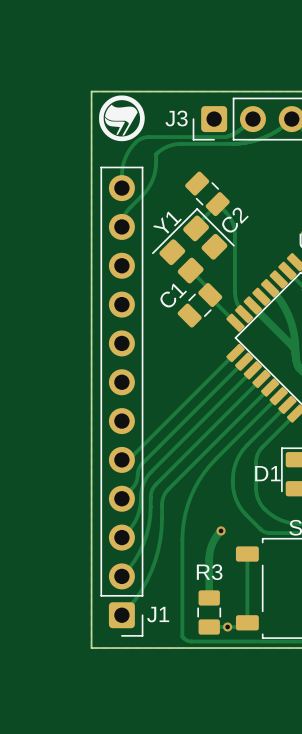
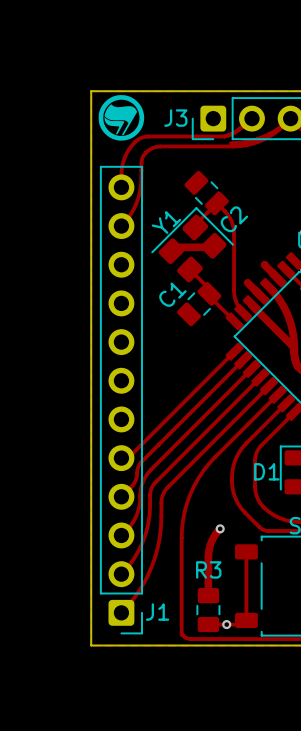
track: none -> (290, 118) (272, 134) (247, 145) (158, 146) (146, 152)
track: (233, 143) (176, 144) (160, 150) (156, 154) (155, 171) (150, 184) (126, 212) (121, 226) -> (141, 170) (140, 191) (136, 203) (121, 226)
track: none -> (145, 152) (141, 159) (141, 170)
track: none -> (213, 245) (175, 247) (171, 251)
track: none -> (264, 264) (277, 278)
track: none -> (247, 282) (260, 295)

